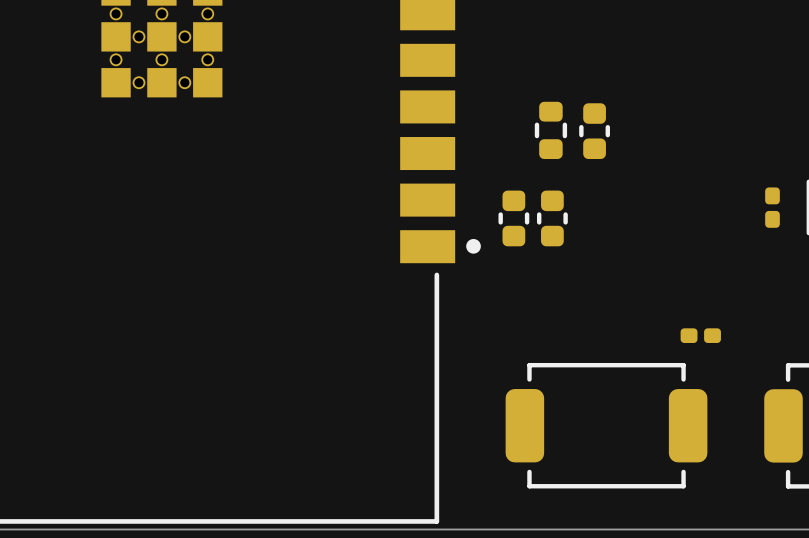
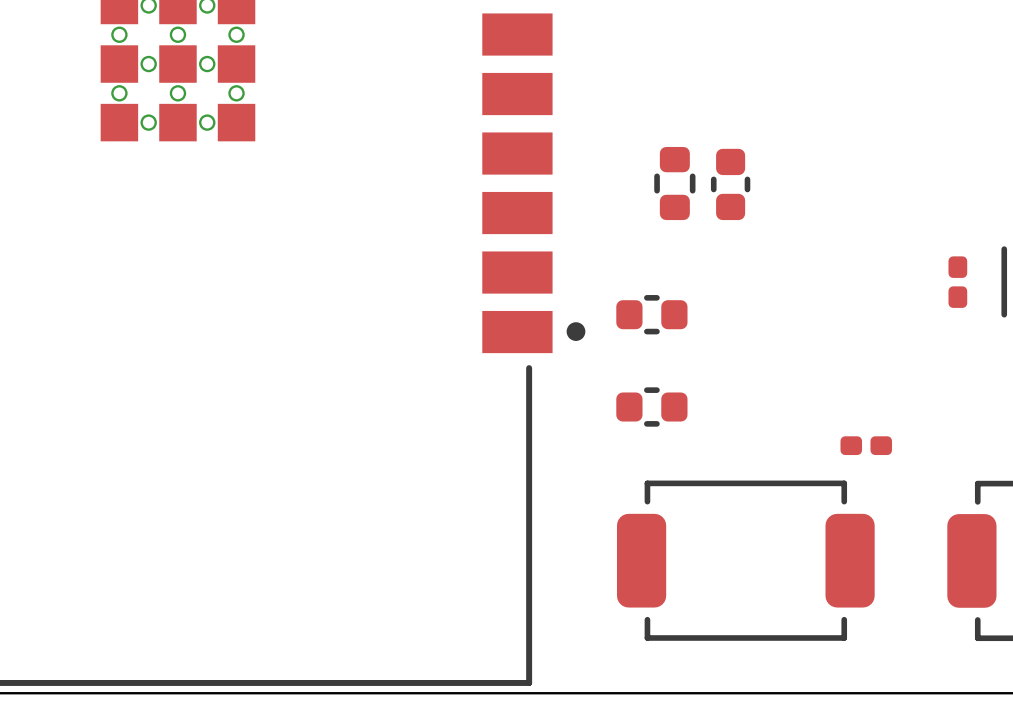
part: (513, 218) -> none
part: (552, 218) -> none
part: none -> (651, 314)
part: none -> (651, 407)

